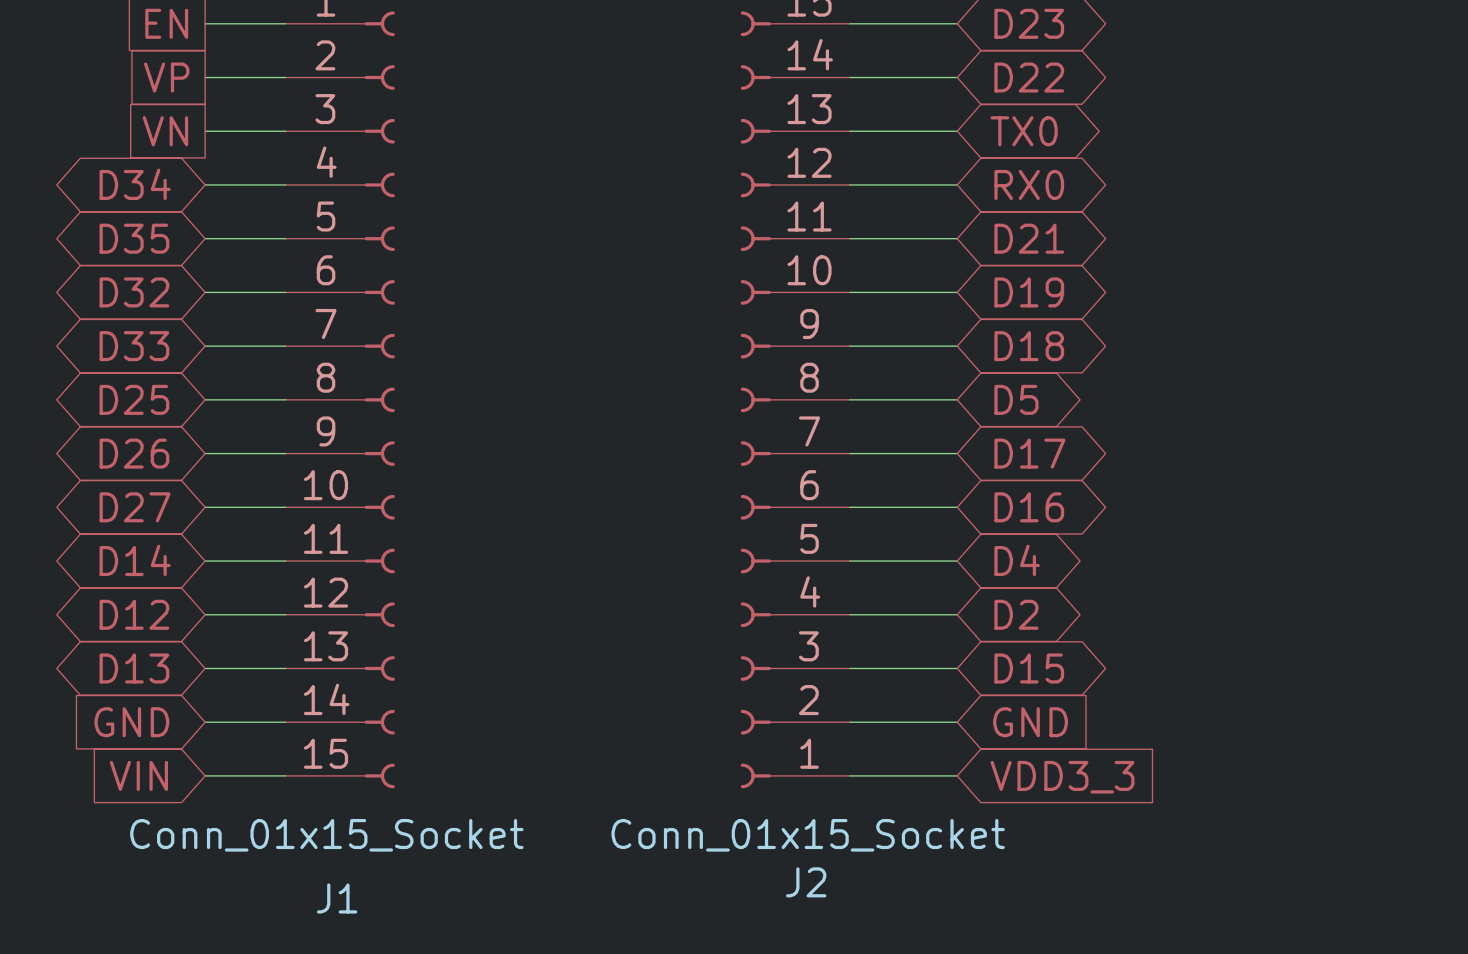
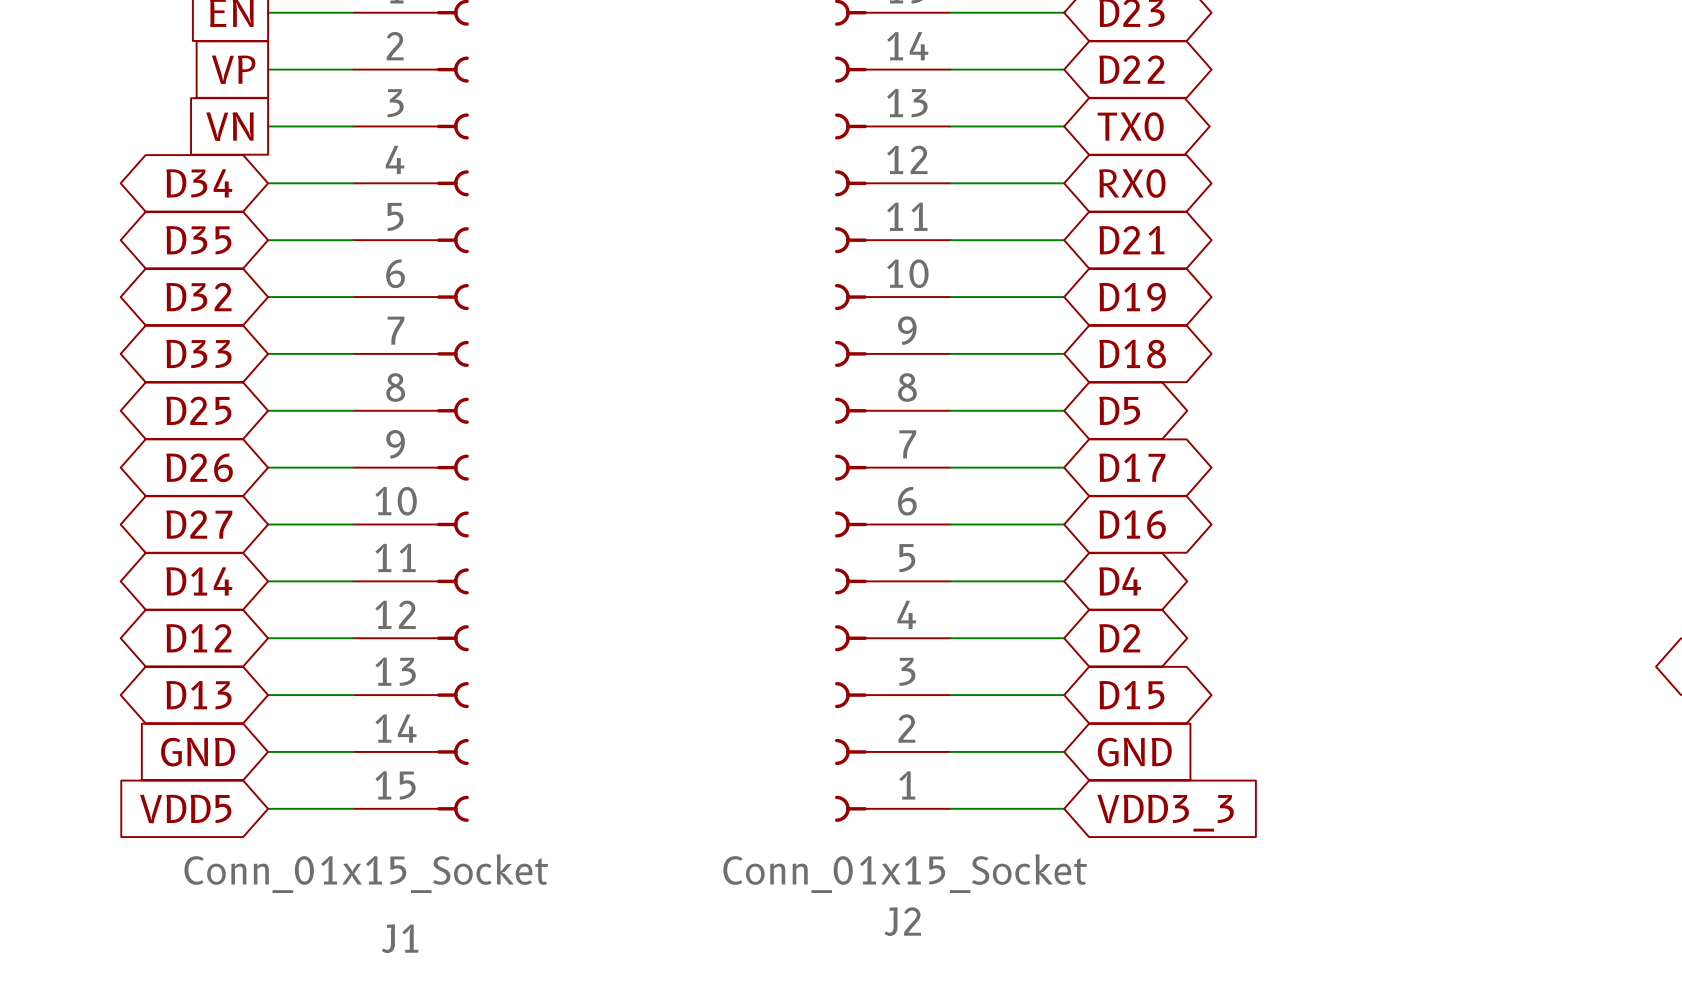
global label: VIN (138, 775) -> VDD5 (185, 809)

